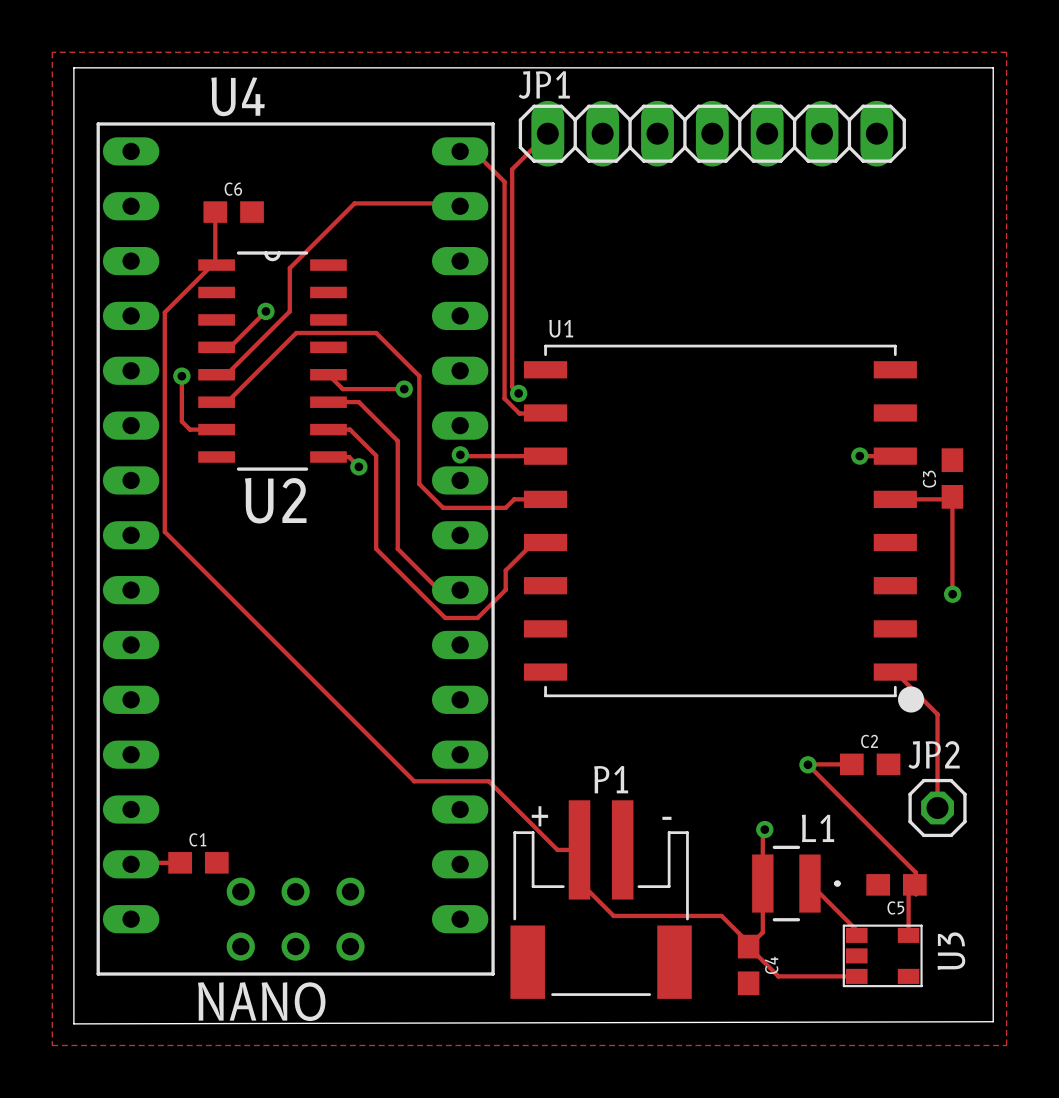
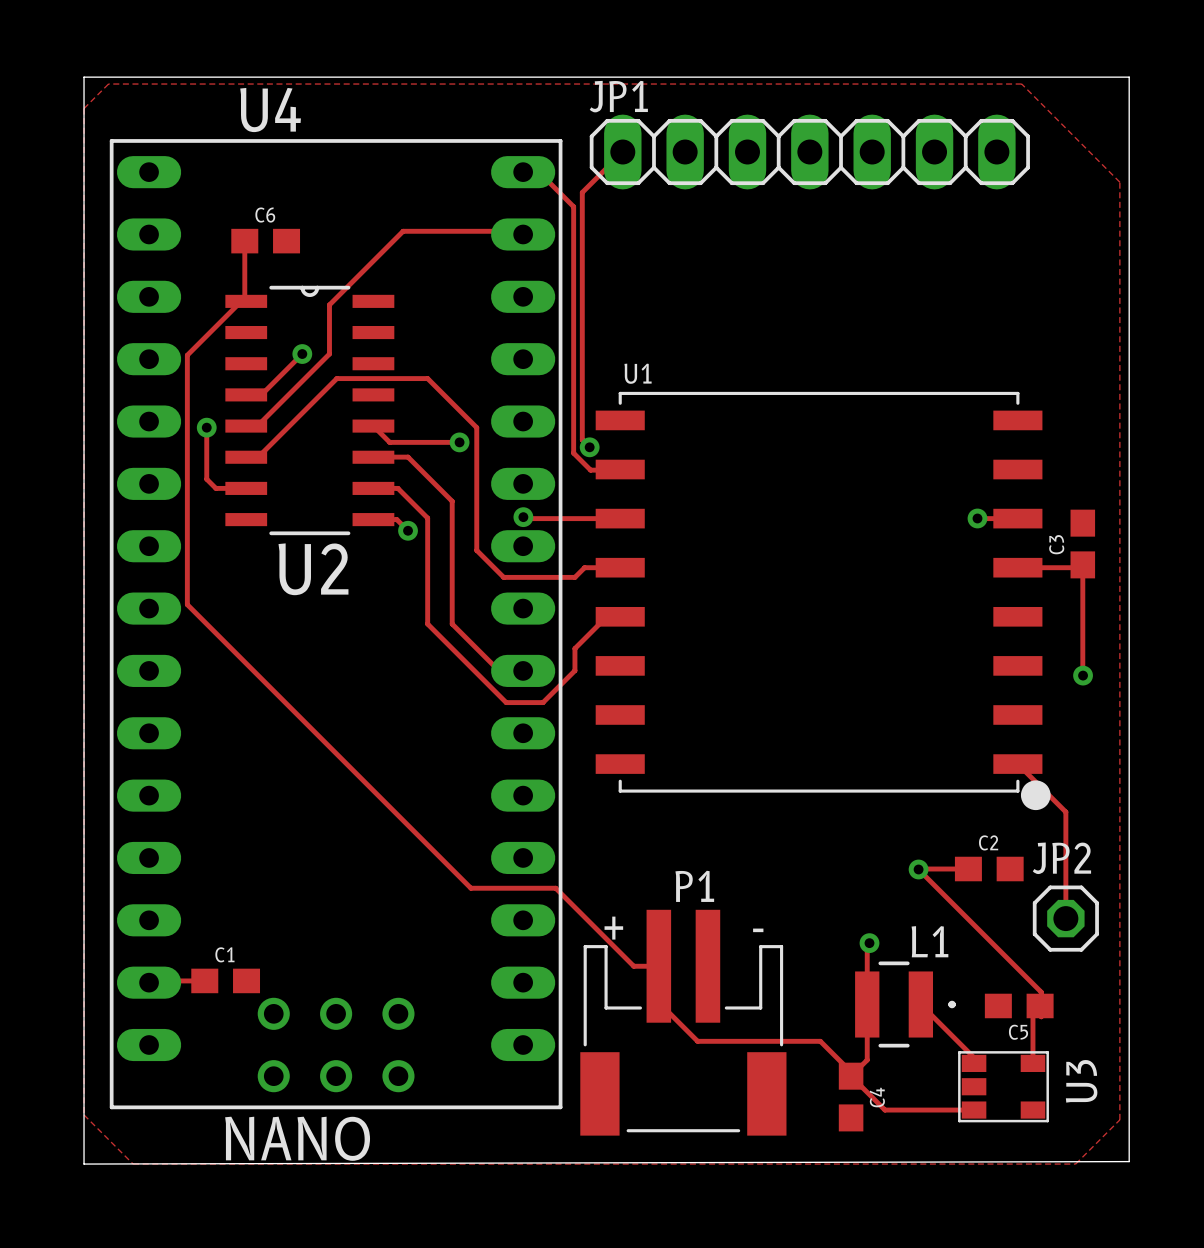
zone outline: (52, 52) (52, 1045) (1006, 1045) (1006, 52) (52, 52) -> (108, 84) (84, 108) (84, 1114) (133, 1164) (1075, 1164) (1119, 1119) (1119, 182) (1021, 84) (108, 84)

